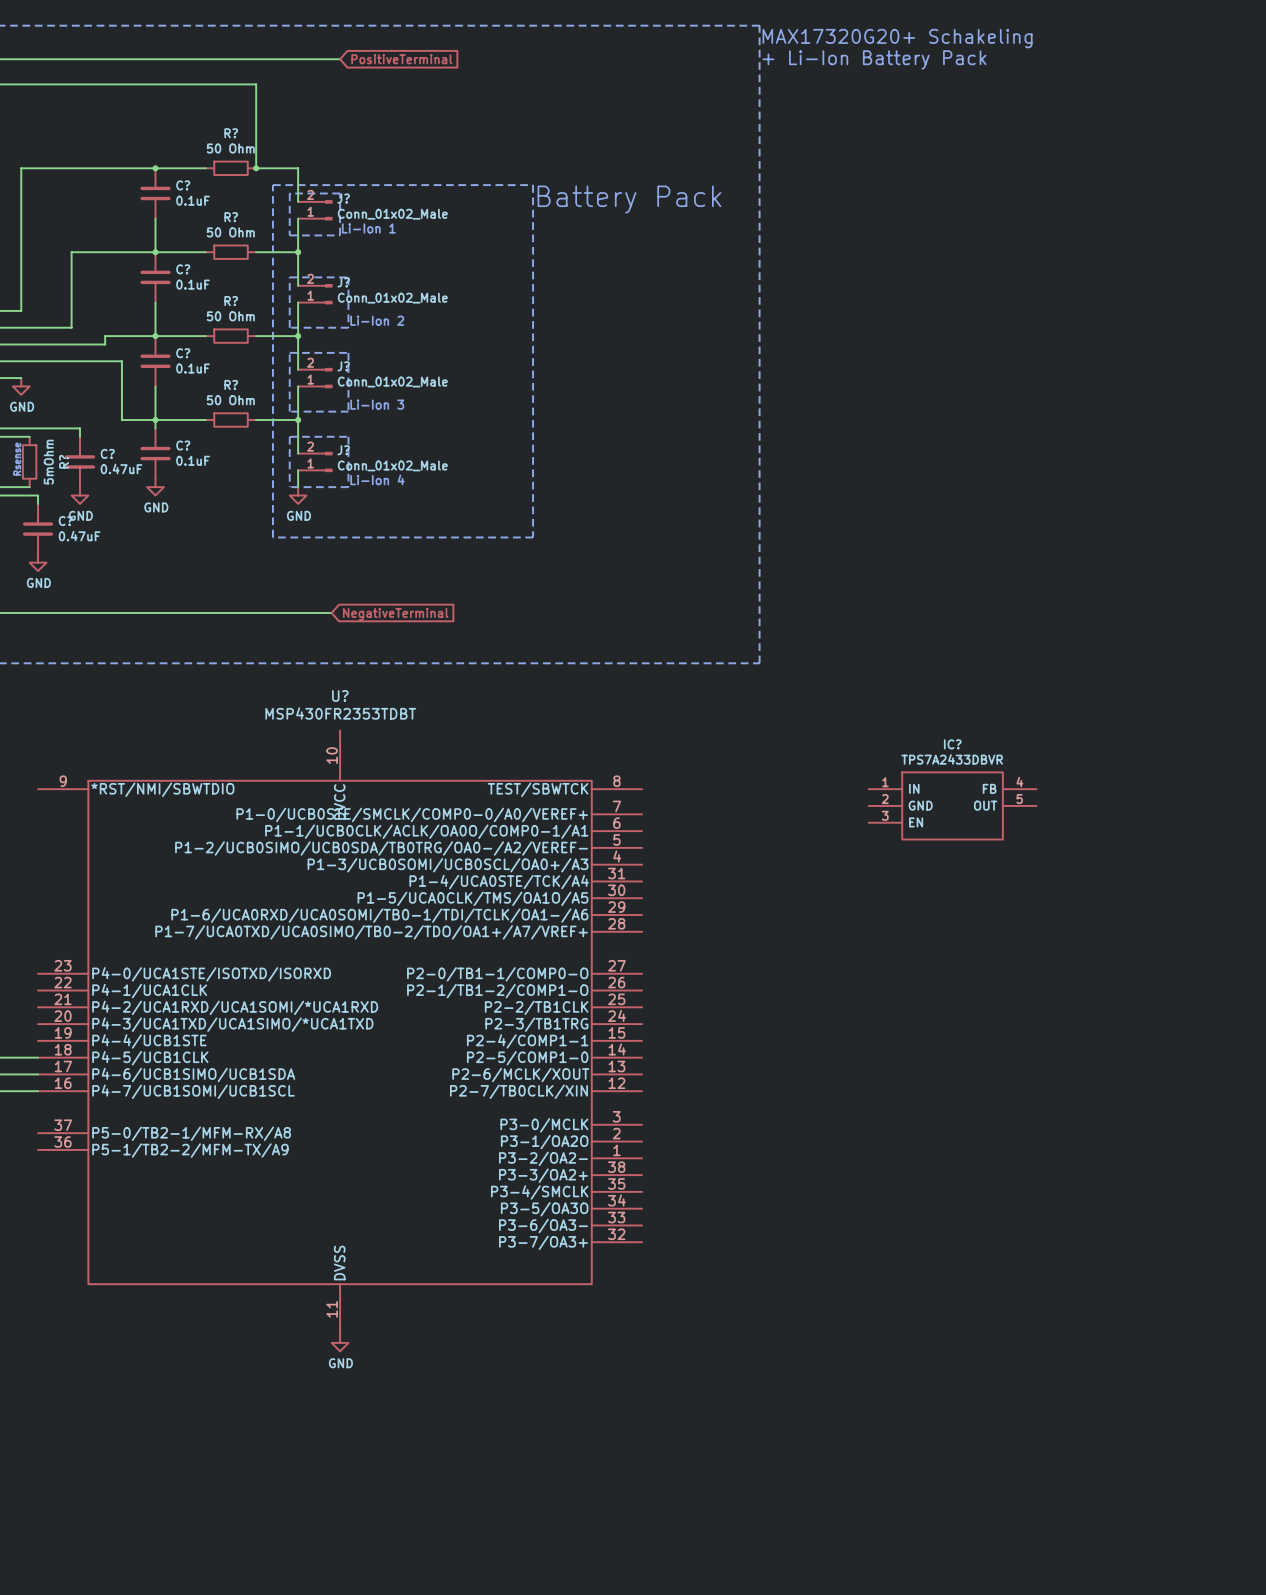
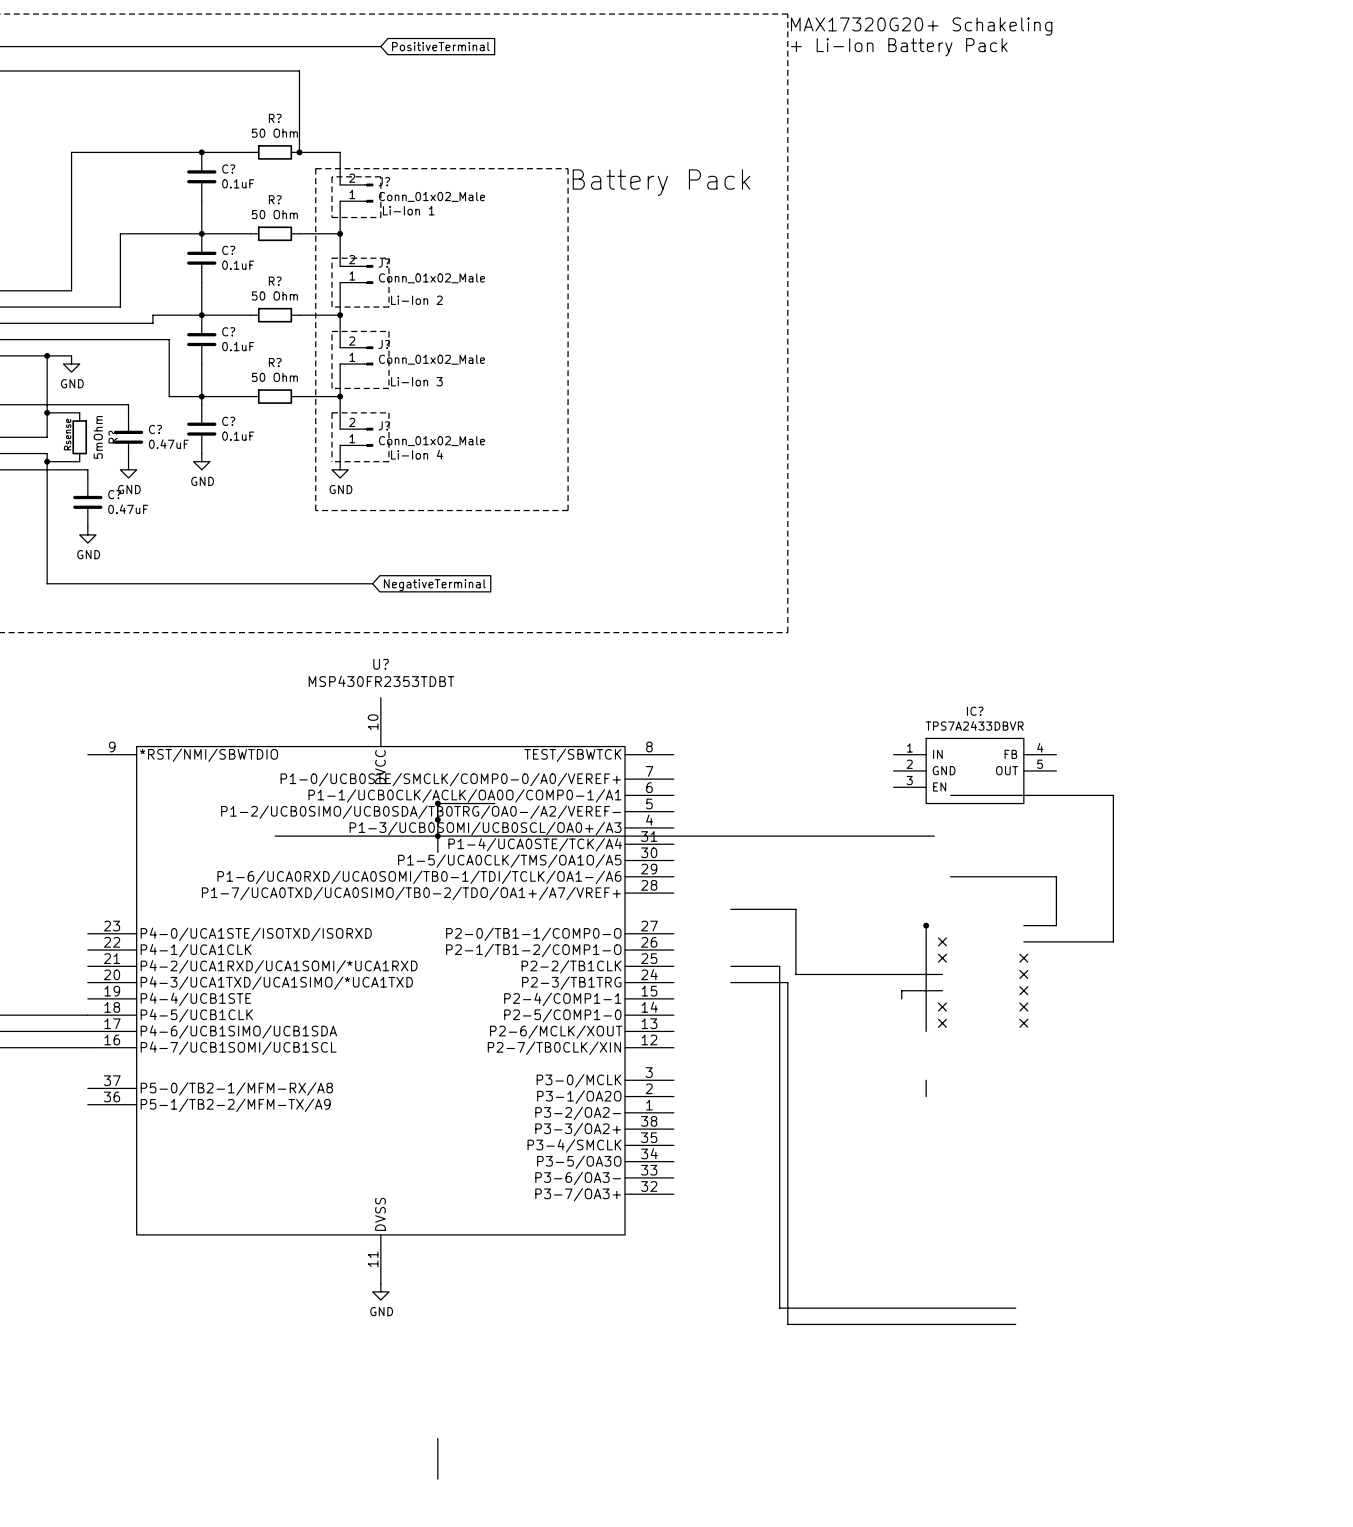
wire: none -> (950, 795) (1113, 795) (1113, 941) (1023, 941)
junction: none -> (437, 803)
wire: none -> (494, 803) (437, 803) (437, 852)
junction: none -> (437, 819)
wire: none -> (275, 836) (934, 836)
junction: none -> (437, 836)
wire: none -> (950, 876) (1056, 876) (1056, 925) (1023, 925)
wire: none -> (730, 909) (795, 909) (795, 974) (942, 974)
wire: none -> (926, 925) (926, 1031)
junction: none -> (926, 925)
no-connect mark: none -> (942, 941)
no-connect mark: none -> (942, 958)
no-connect mark: none -> (1023, 958)
wire: none -> (730, 966) (779, 966) (779, 1308) (1015, 1308)
no-connect mark: none -> (1023, 974)
wire: none -> (730, 982) (787, 982) (787, 1324) (1015, 1324)
wire: none -> (942, 990) (901, 990) (901, 998)
no-connect mark: none -> (1023, 990)
no-connect mark: none -> (942, 1007)
no-connect mark: none -> (1023, 1007)
no-connect mark: none -> (942, 1023)
no-connect mark: none -> (1023, 1023)
wire: none -> (926, 1080) (926, 1096)
wire: none -> (437, 1438) (437, 1479)

